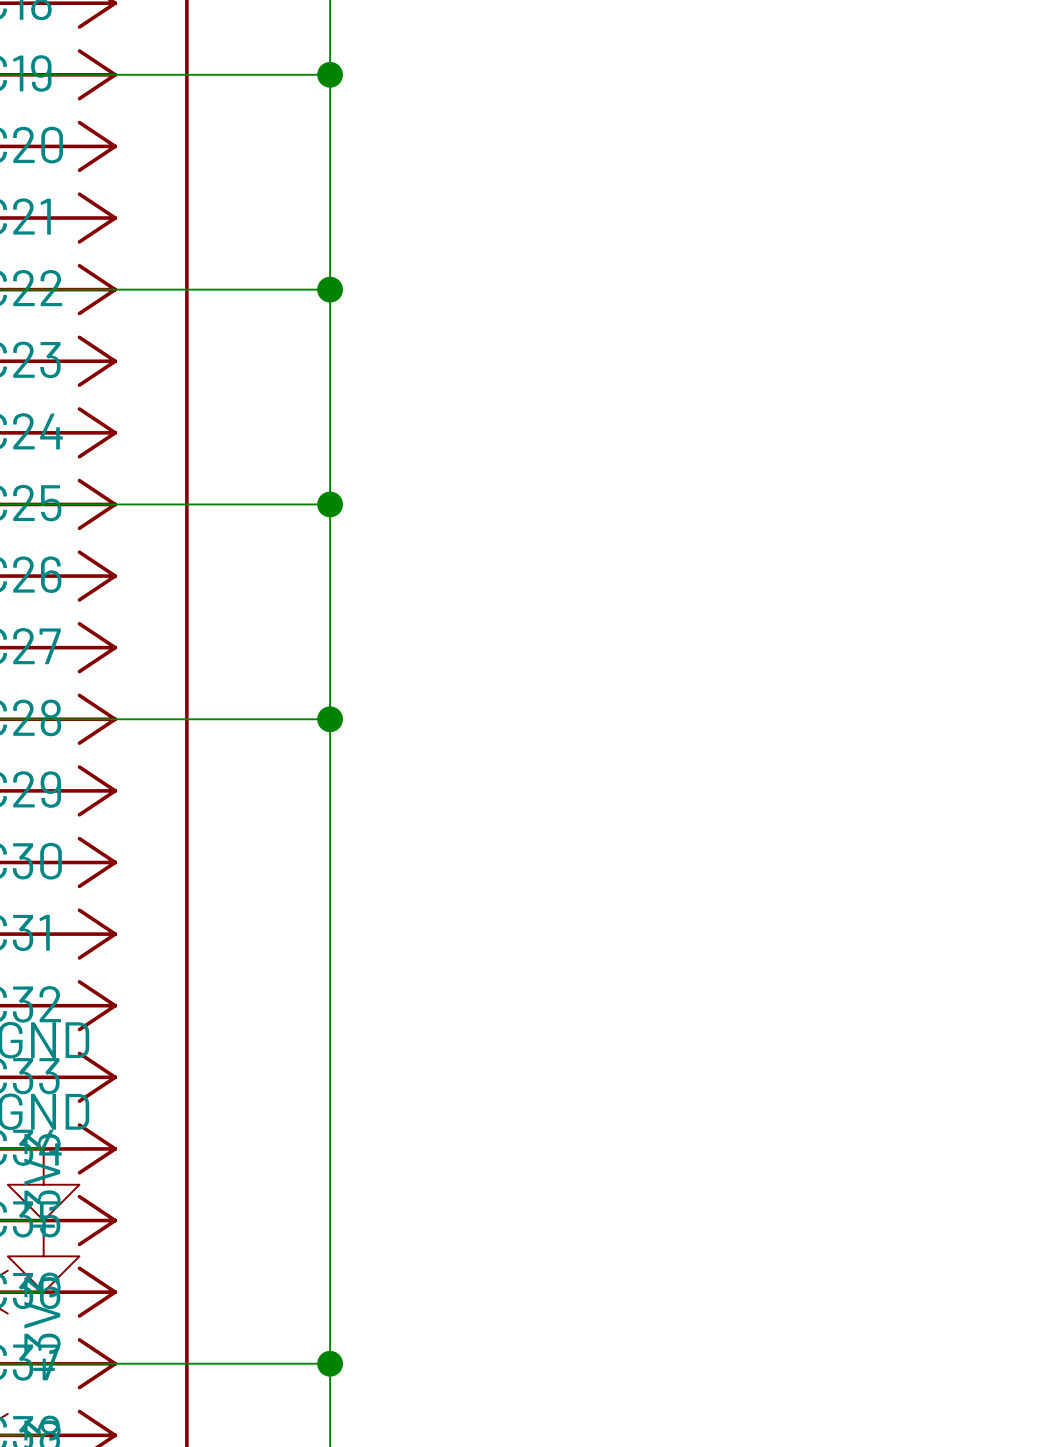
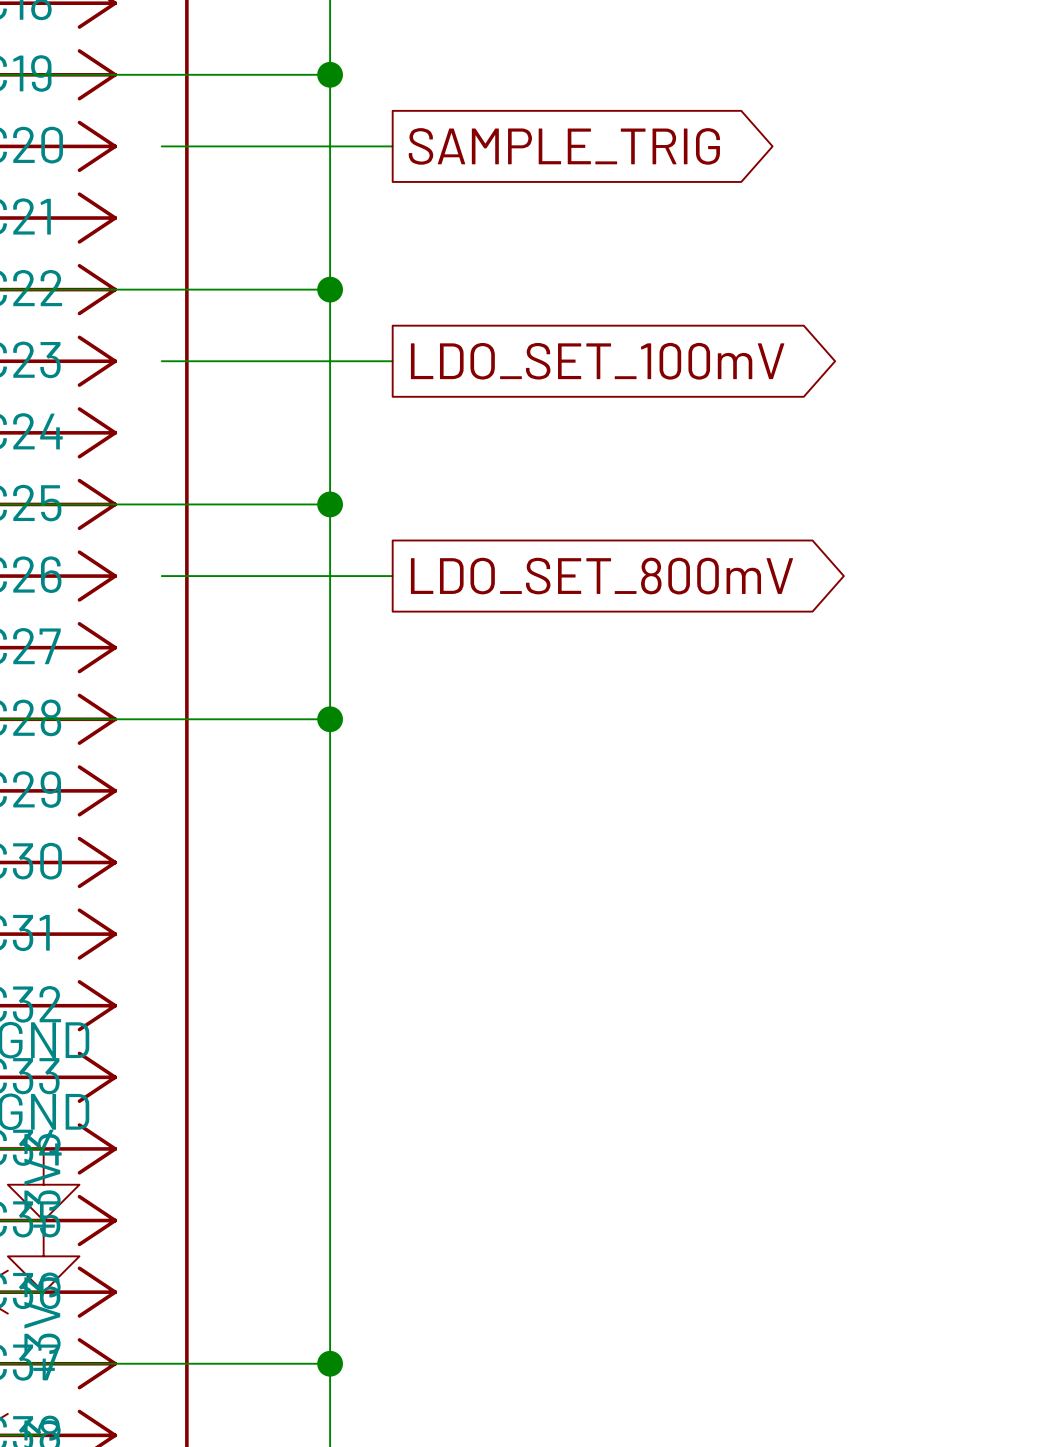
wire: none -> (161, 146) (392, 146)
global label: none -> SAMPLE_TRIG (564, 146)
wire: none -> (161, 361) (392, 361)
global label: none -> LDO_SET_100mV (597, 361)
wire: none -> (161, 576) (392, 576)
global label: none -> LDO_SET_800mV (602, 576)

